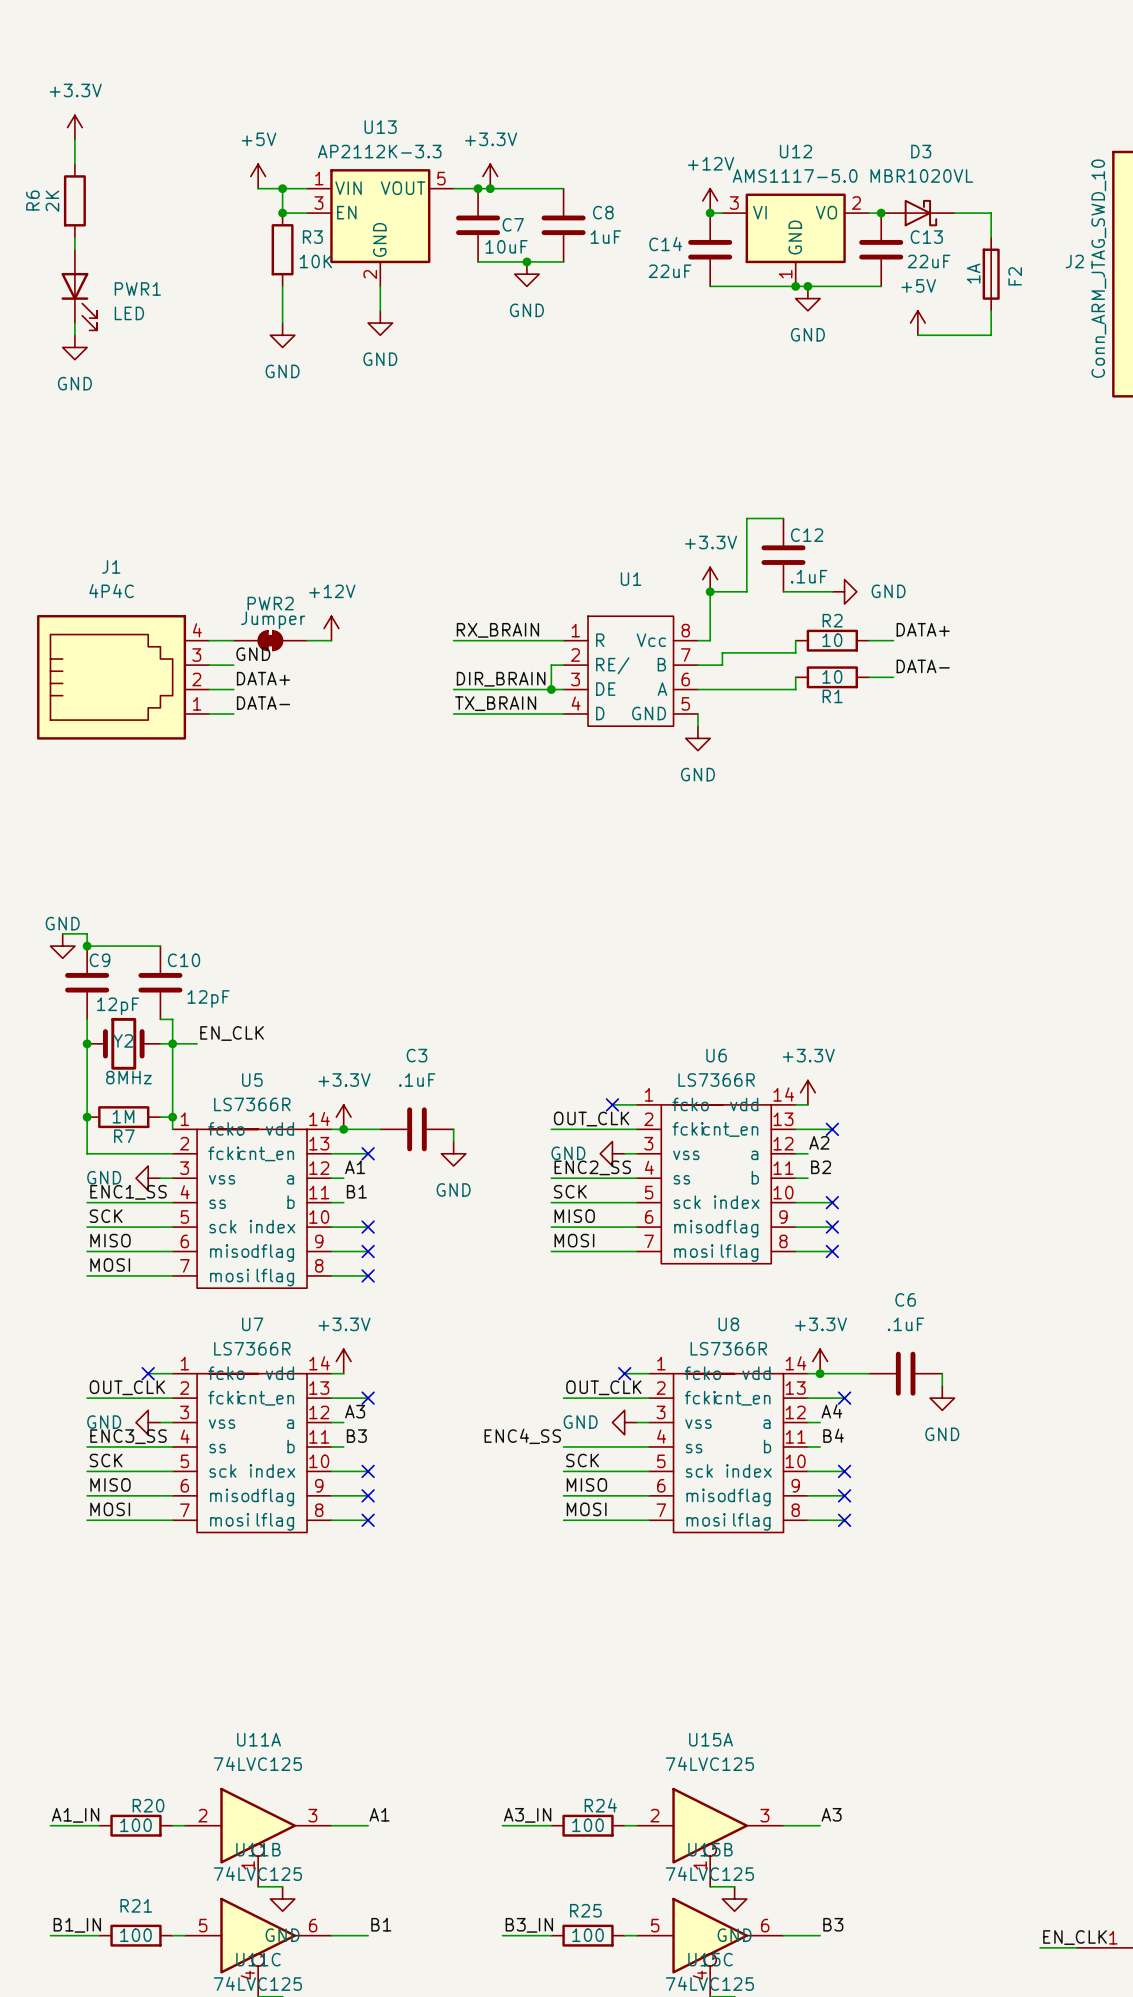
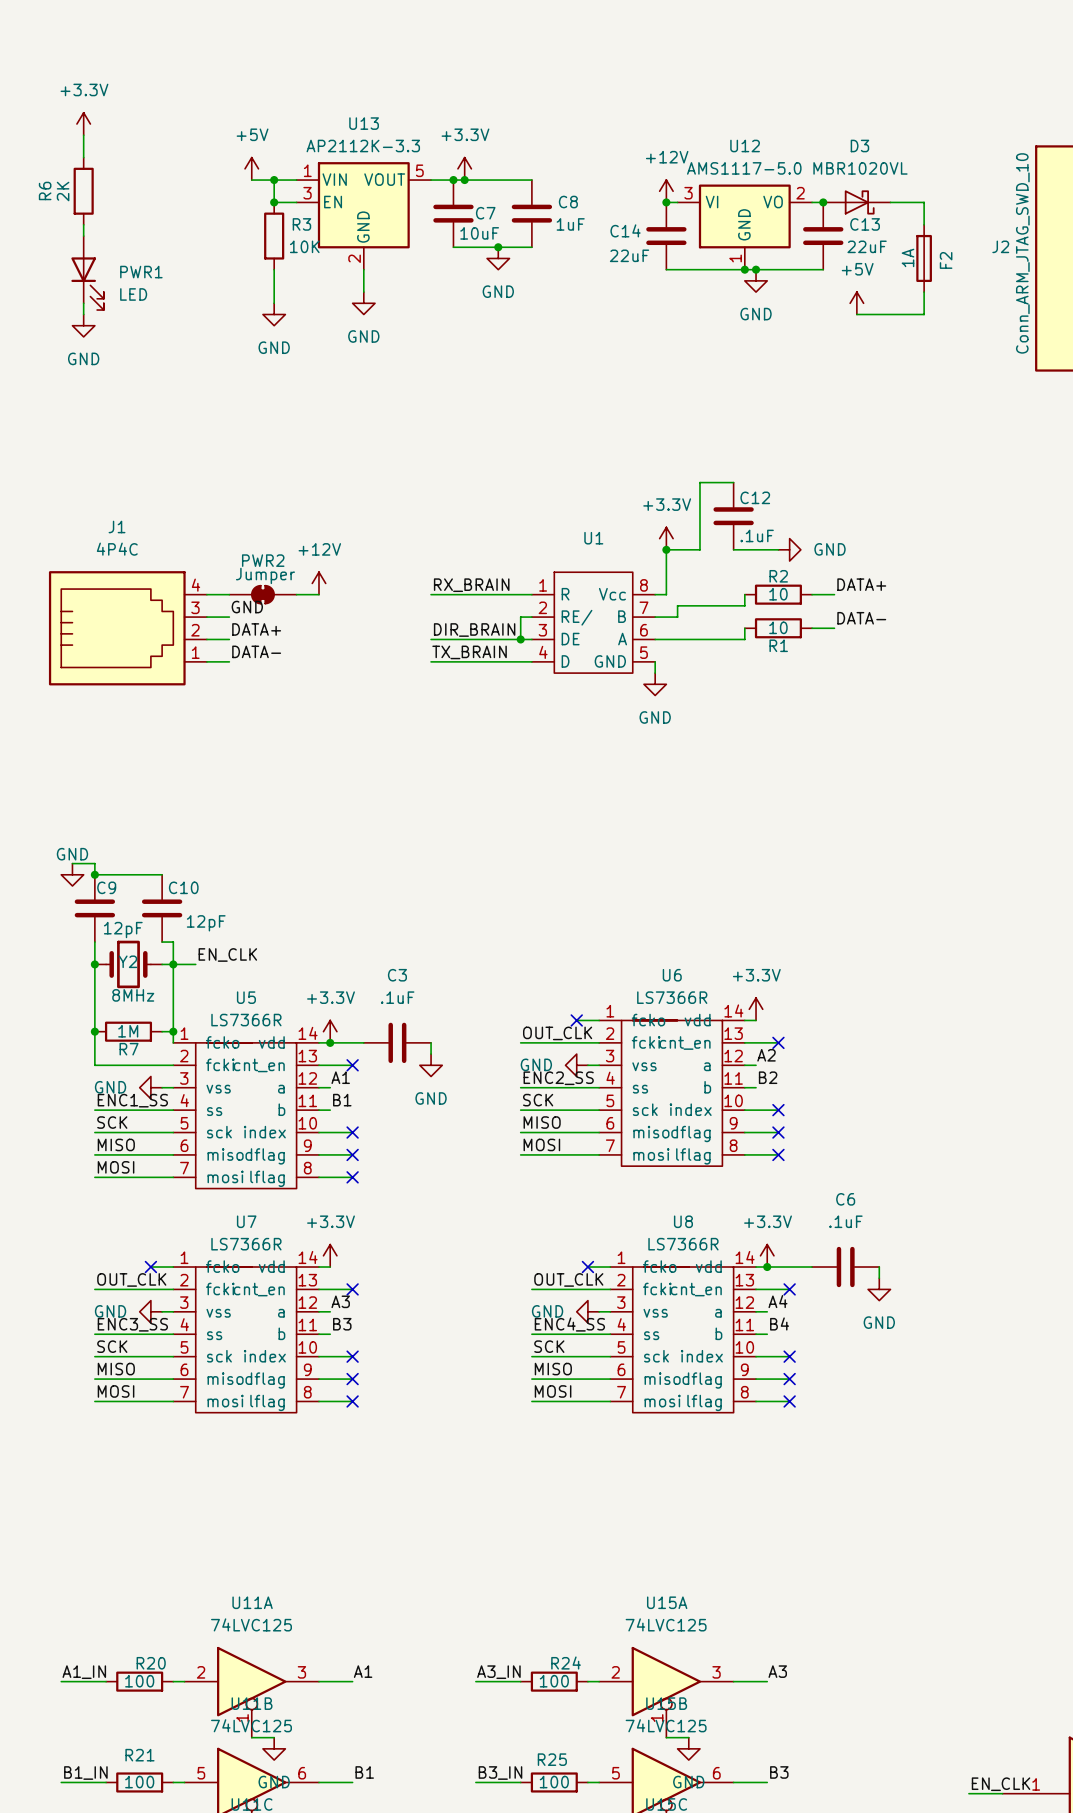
label position: ENC4_SS (522, 1436) -> ENC4_SS (569, 1324)

